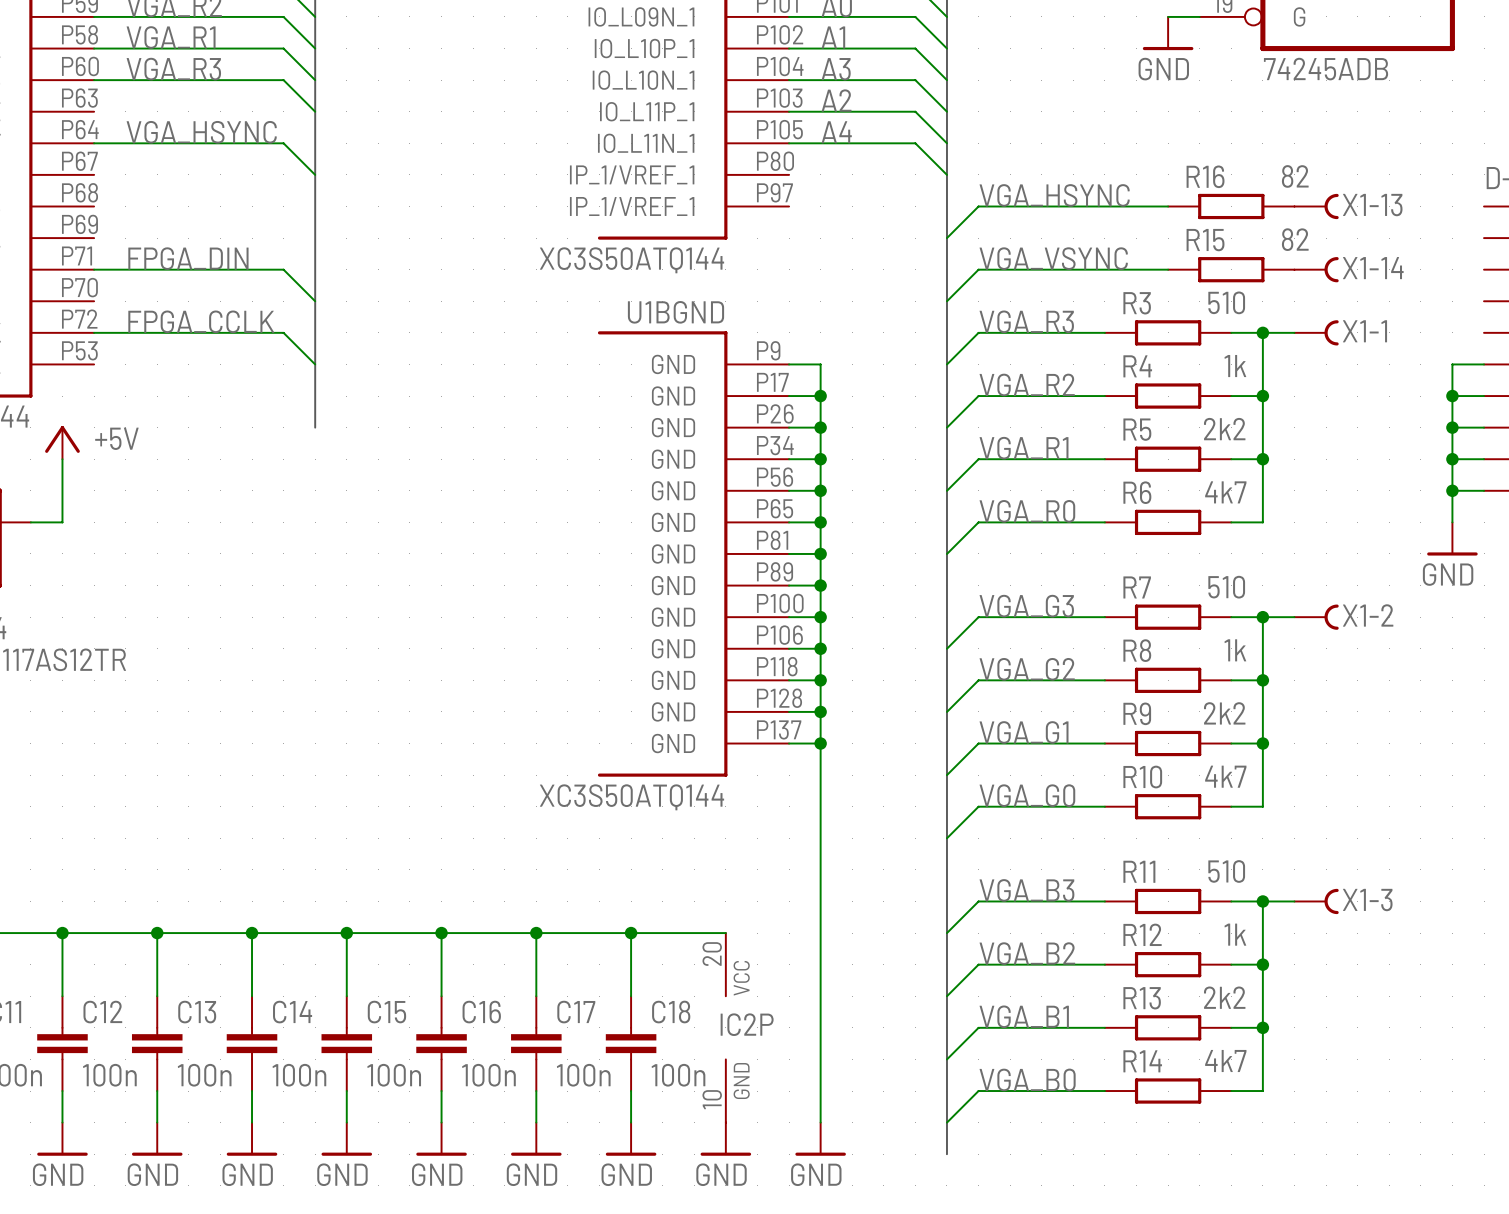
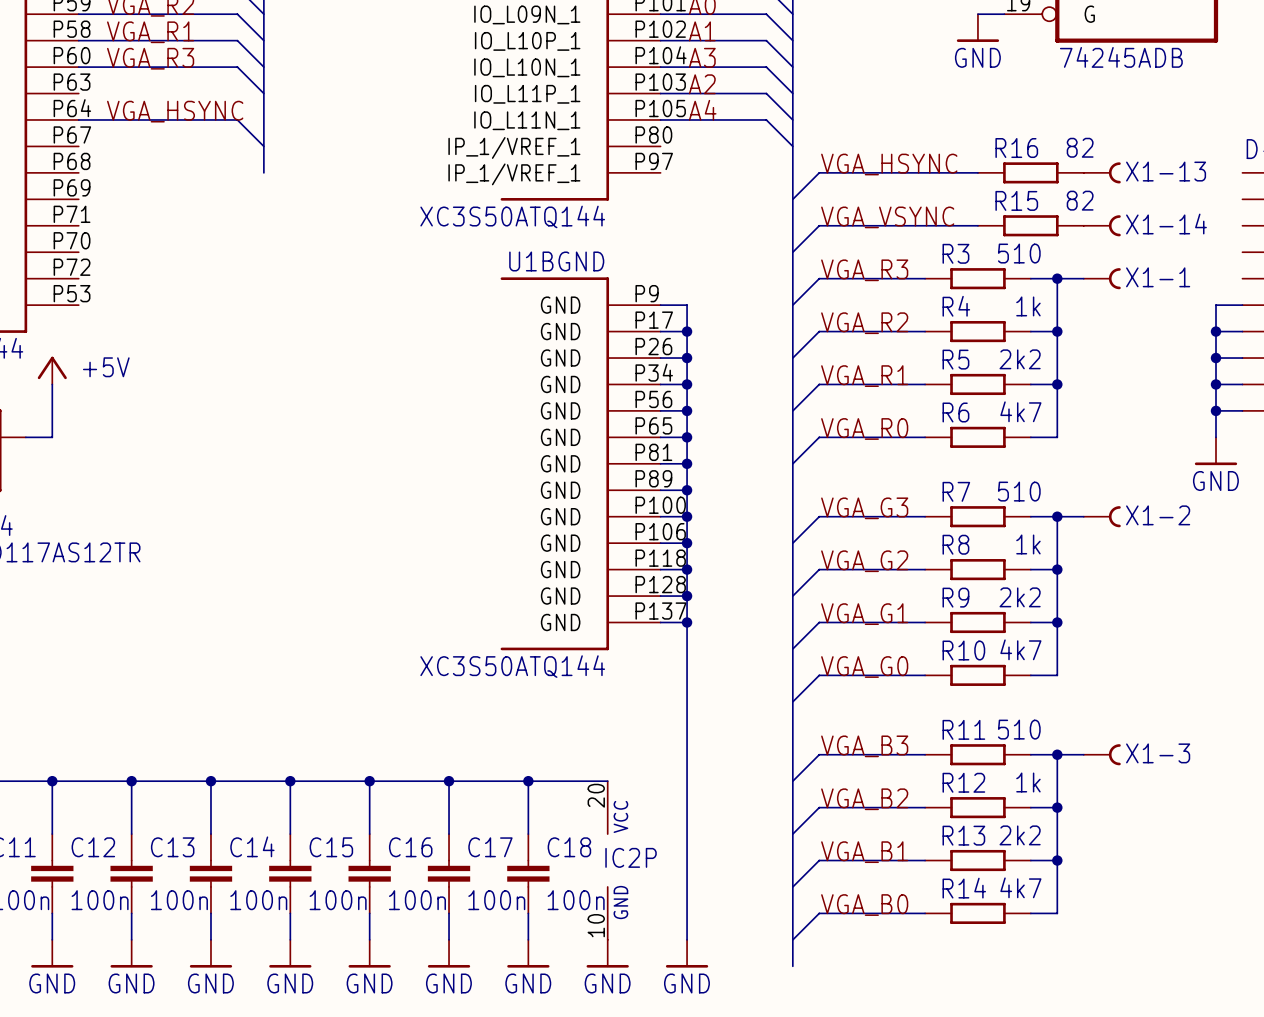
bus: (315, 206) (315, 427) -> none
label: FPGA_DIN (188, 258) -> none
wire: (94, 269) (283, 269) (315, 301) -> none
label: FPGA_CCLK (201, 321) -> none
wire: (94, 332) (283, 332) (315, 364) -> none

